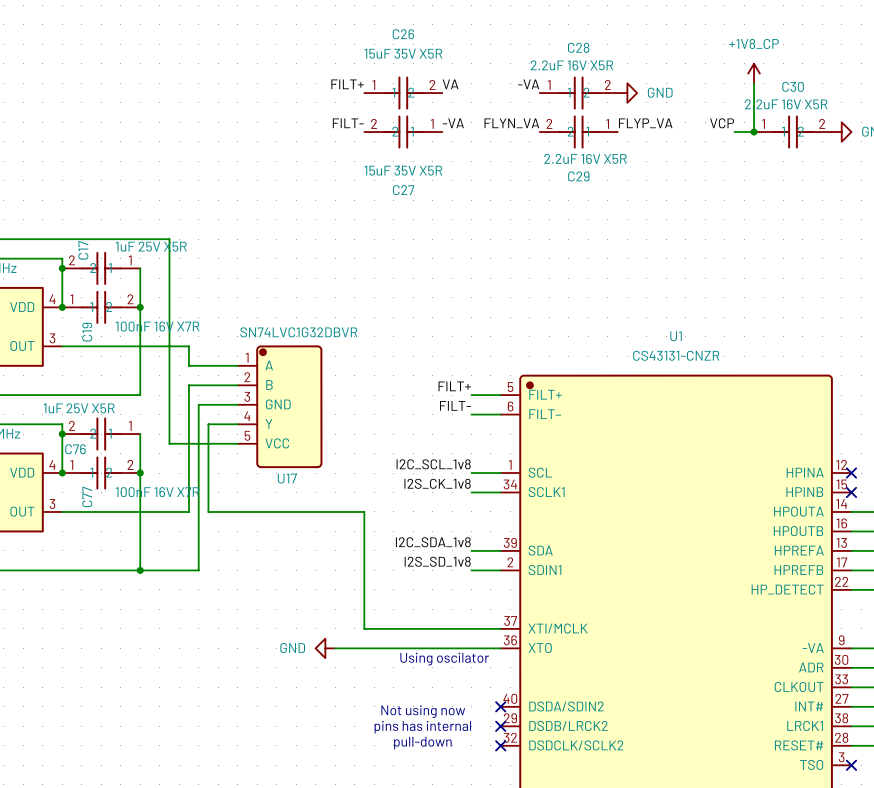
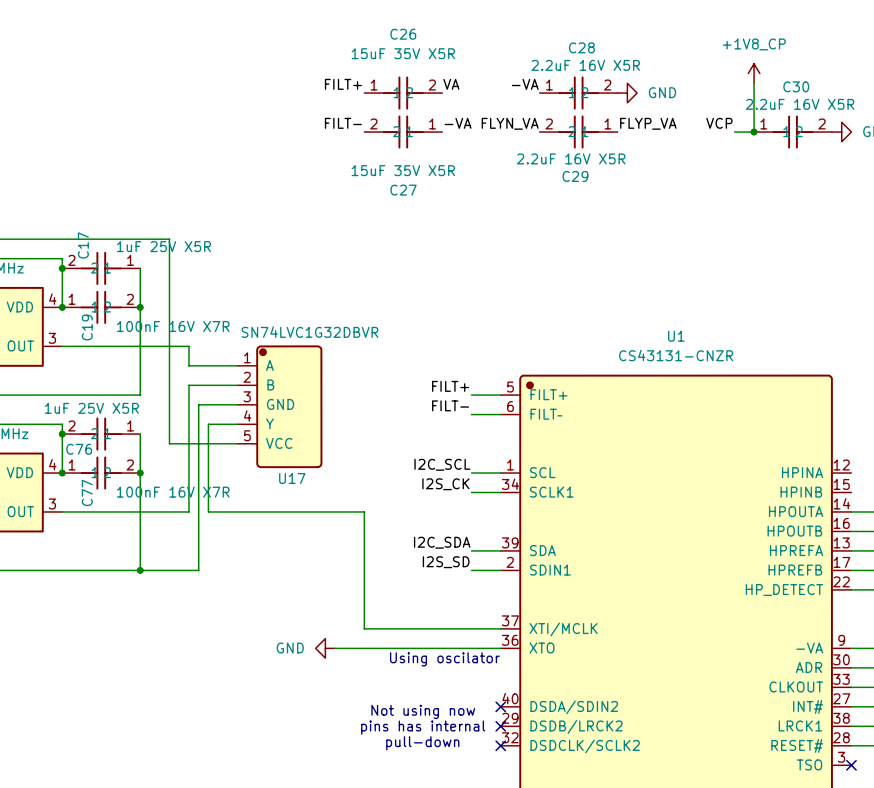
label: I2C_SCL_1v8 (433, 464) -> I2C_SCL (442, 464)
no-connect mark: (851, 473) -> none
label: I2S_CK_1v8 (437, 483) -> I2S_CK (445, 484)
no-connect mark: (851, 492) -> none
label: I2C_SDA_1v8 (433, 542) -> I2C_SDA (442, 542)
label: I2S_SD_1v8 (437, 561) -> I2S_SD (446, 562)

